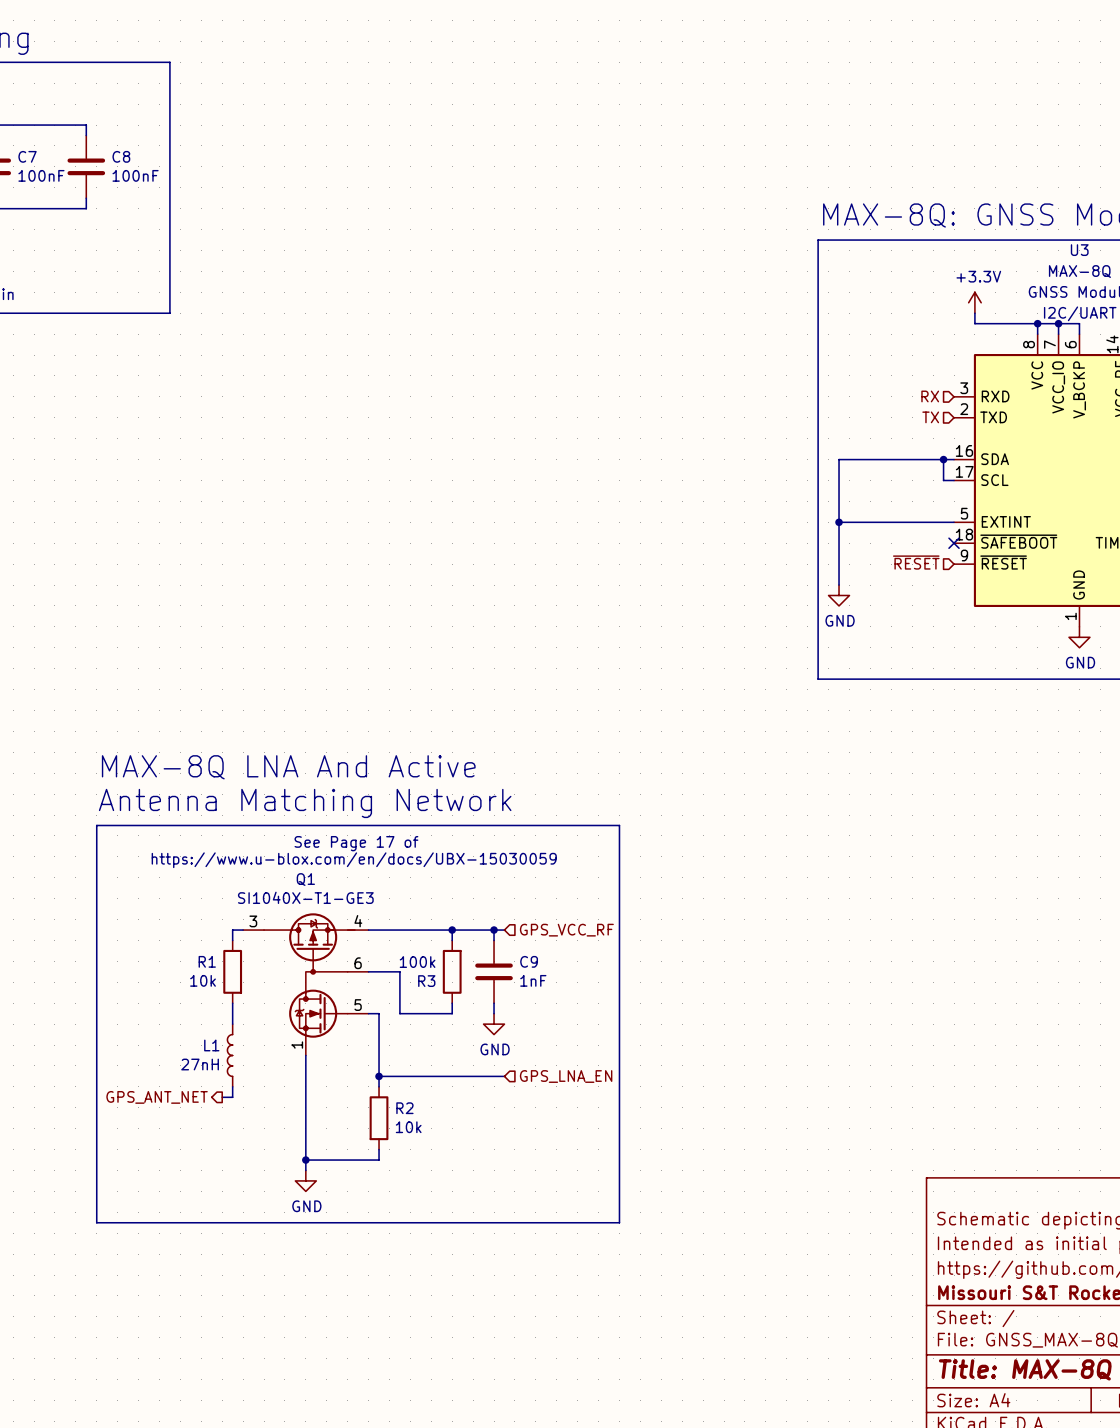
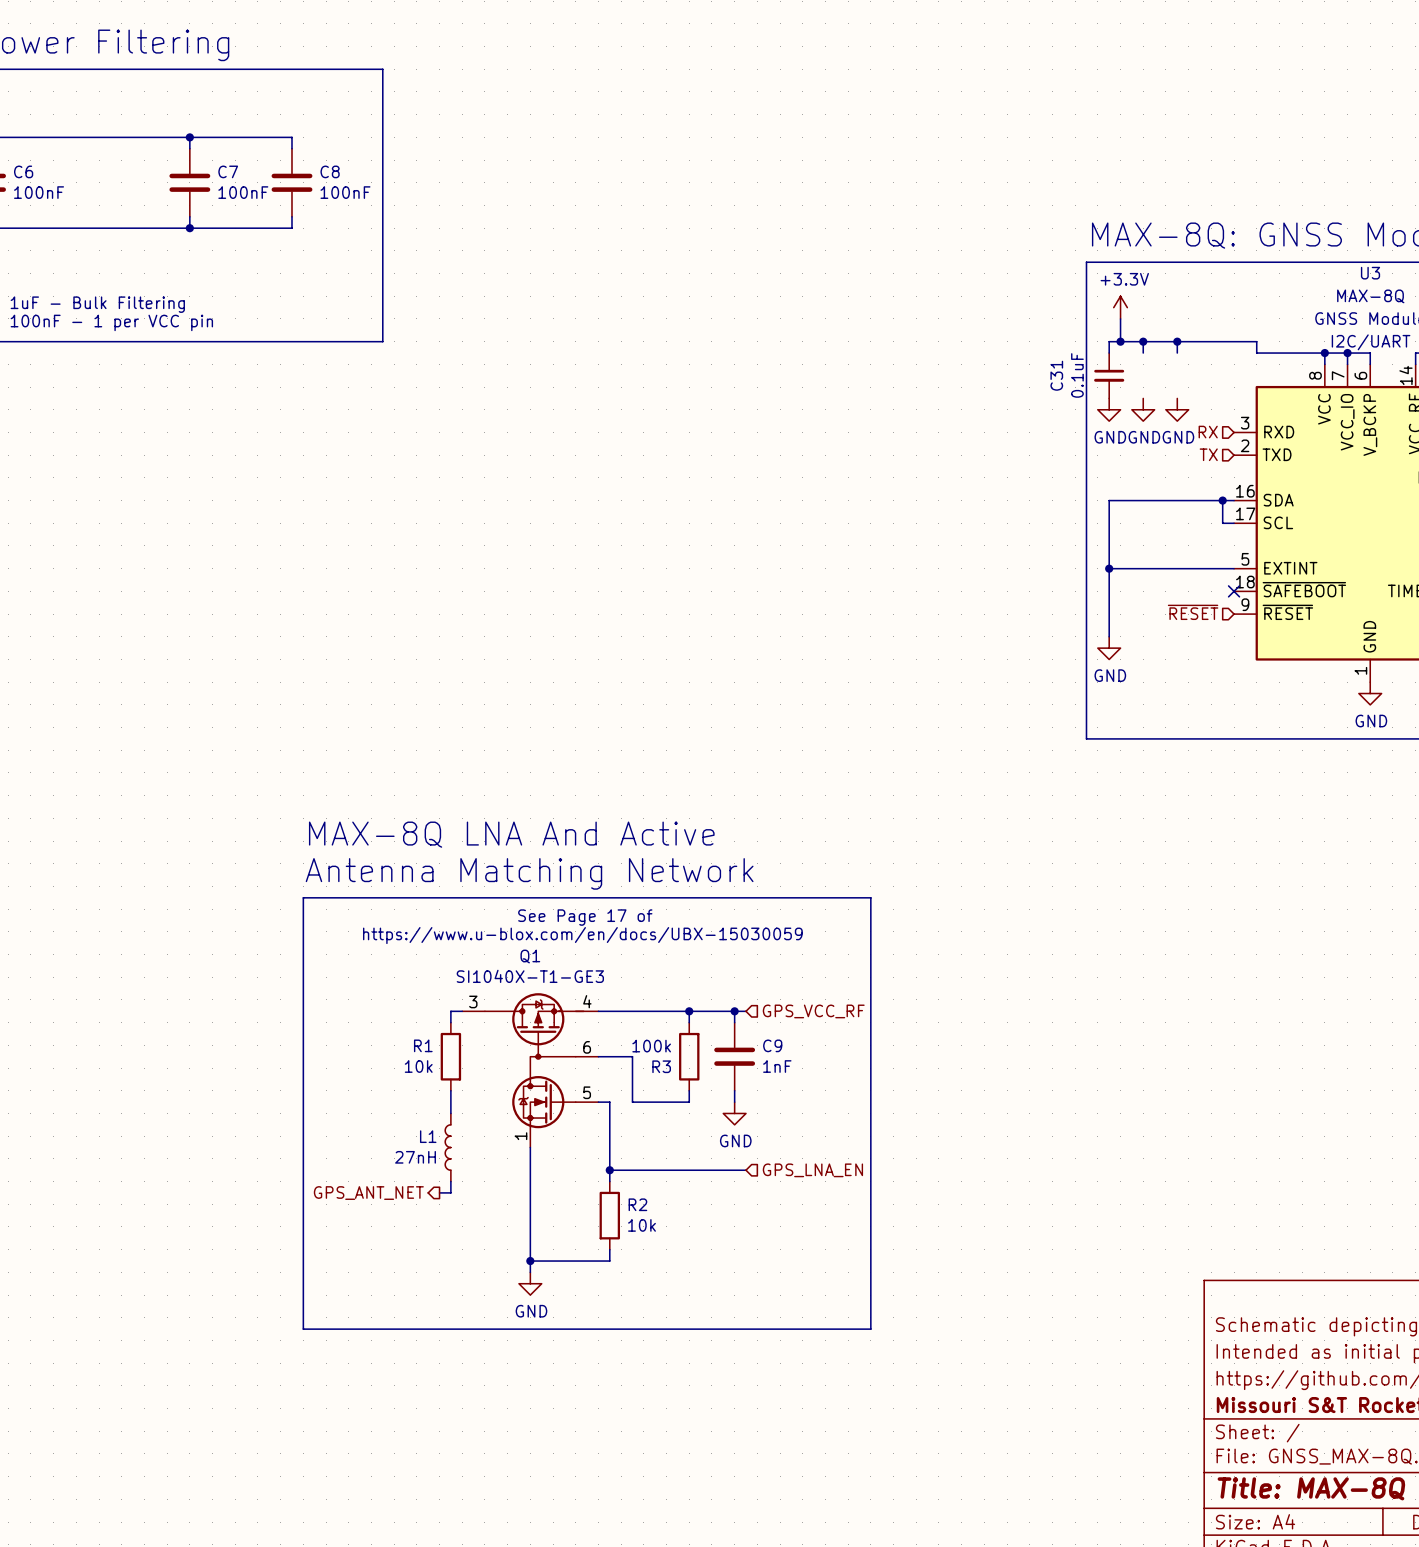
wire: none -> (1120, 318) (1120, 341)
power symbol position: +3.3V (974, 302) -> +3.3V (1120, 307)
junction: none -> (1120, 341)
wire: none -> (1143, 341) (1143, 353)
junction: none -> (1143, 341)
wire: none -> (1177, 341) (1177, 353)
junction: none -> (1177, 341)
wire: none -> (1256, 341) (1109, 341) (1109, 353)
C31: none -> 0.1uF (1109, 375)
power symbol: none -> GND (1109, 409)
power symbol: none -> GND (1143, 409)
power symbol: none -> GND (1177, 409)

